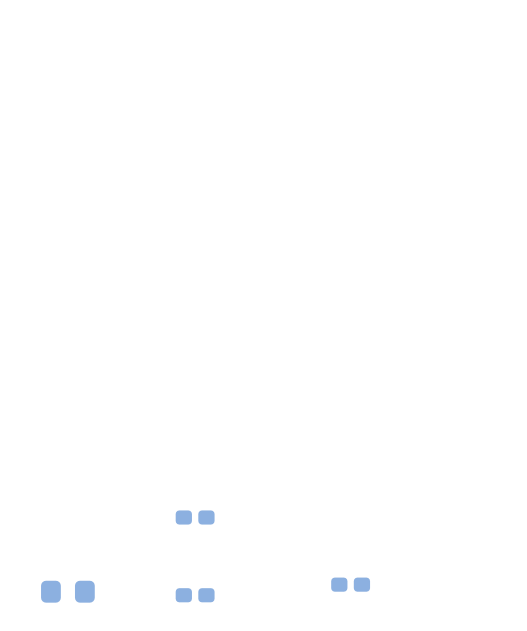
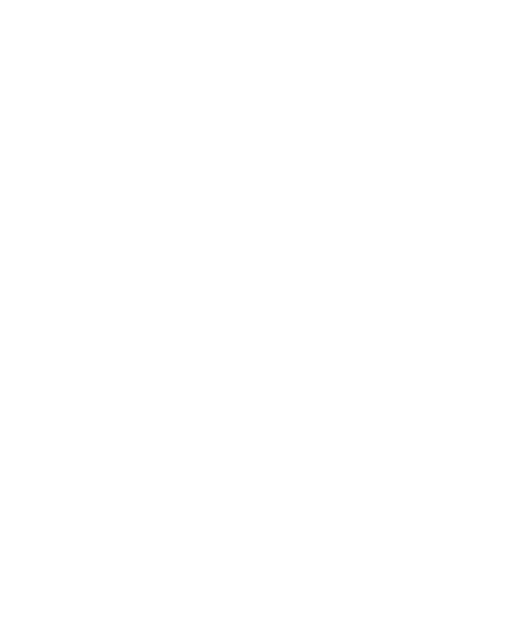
part: (195, 517) -> none
part: (350, 584) -> none
part: (67, 591) -> none
part: (195, 595) -> none

